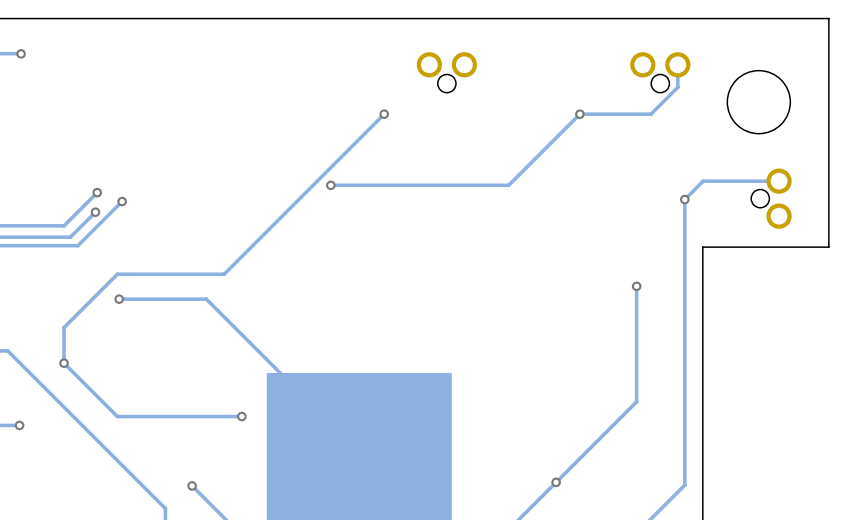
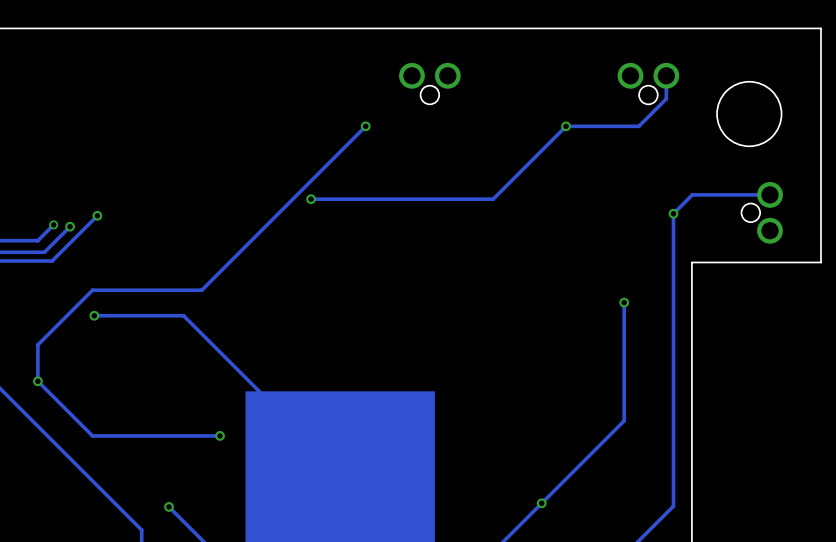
track: (97, 192) (79, 210) -> none
via: (97, 192) -> none
via: none -> (53, 224)

